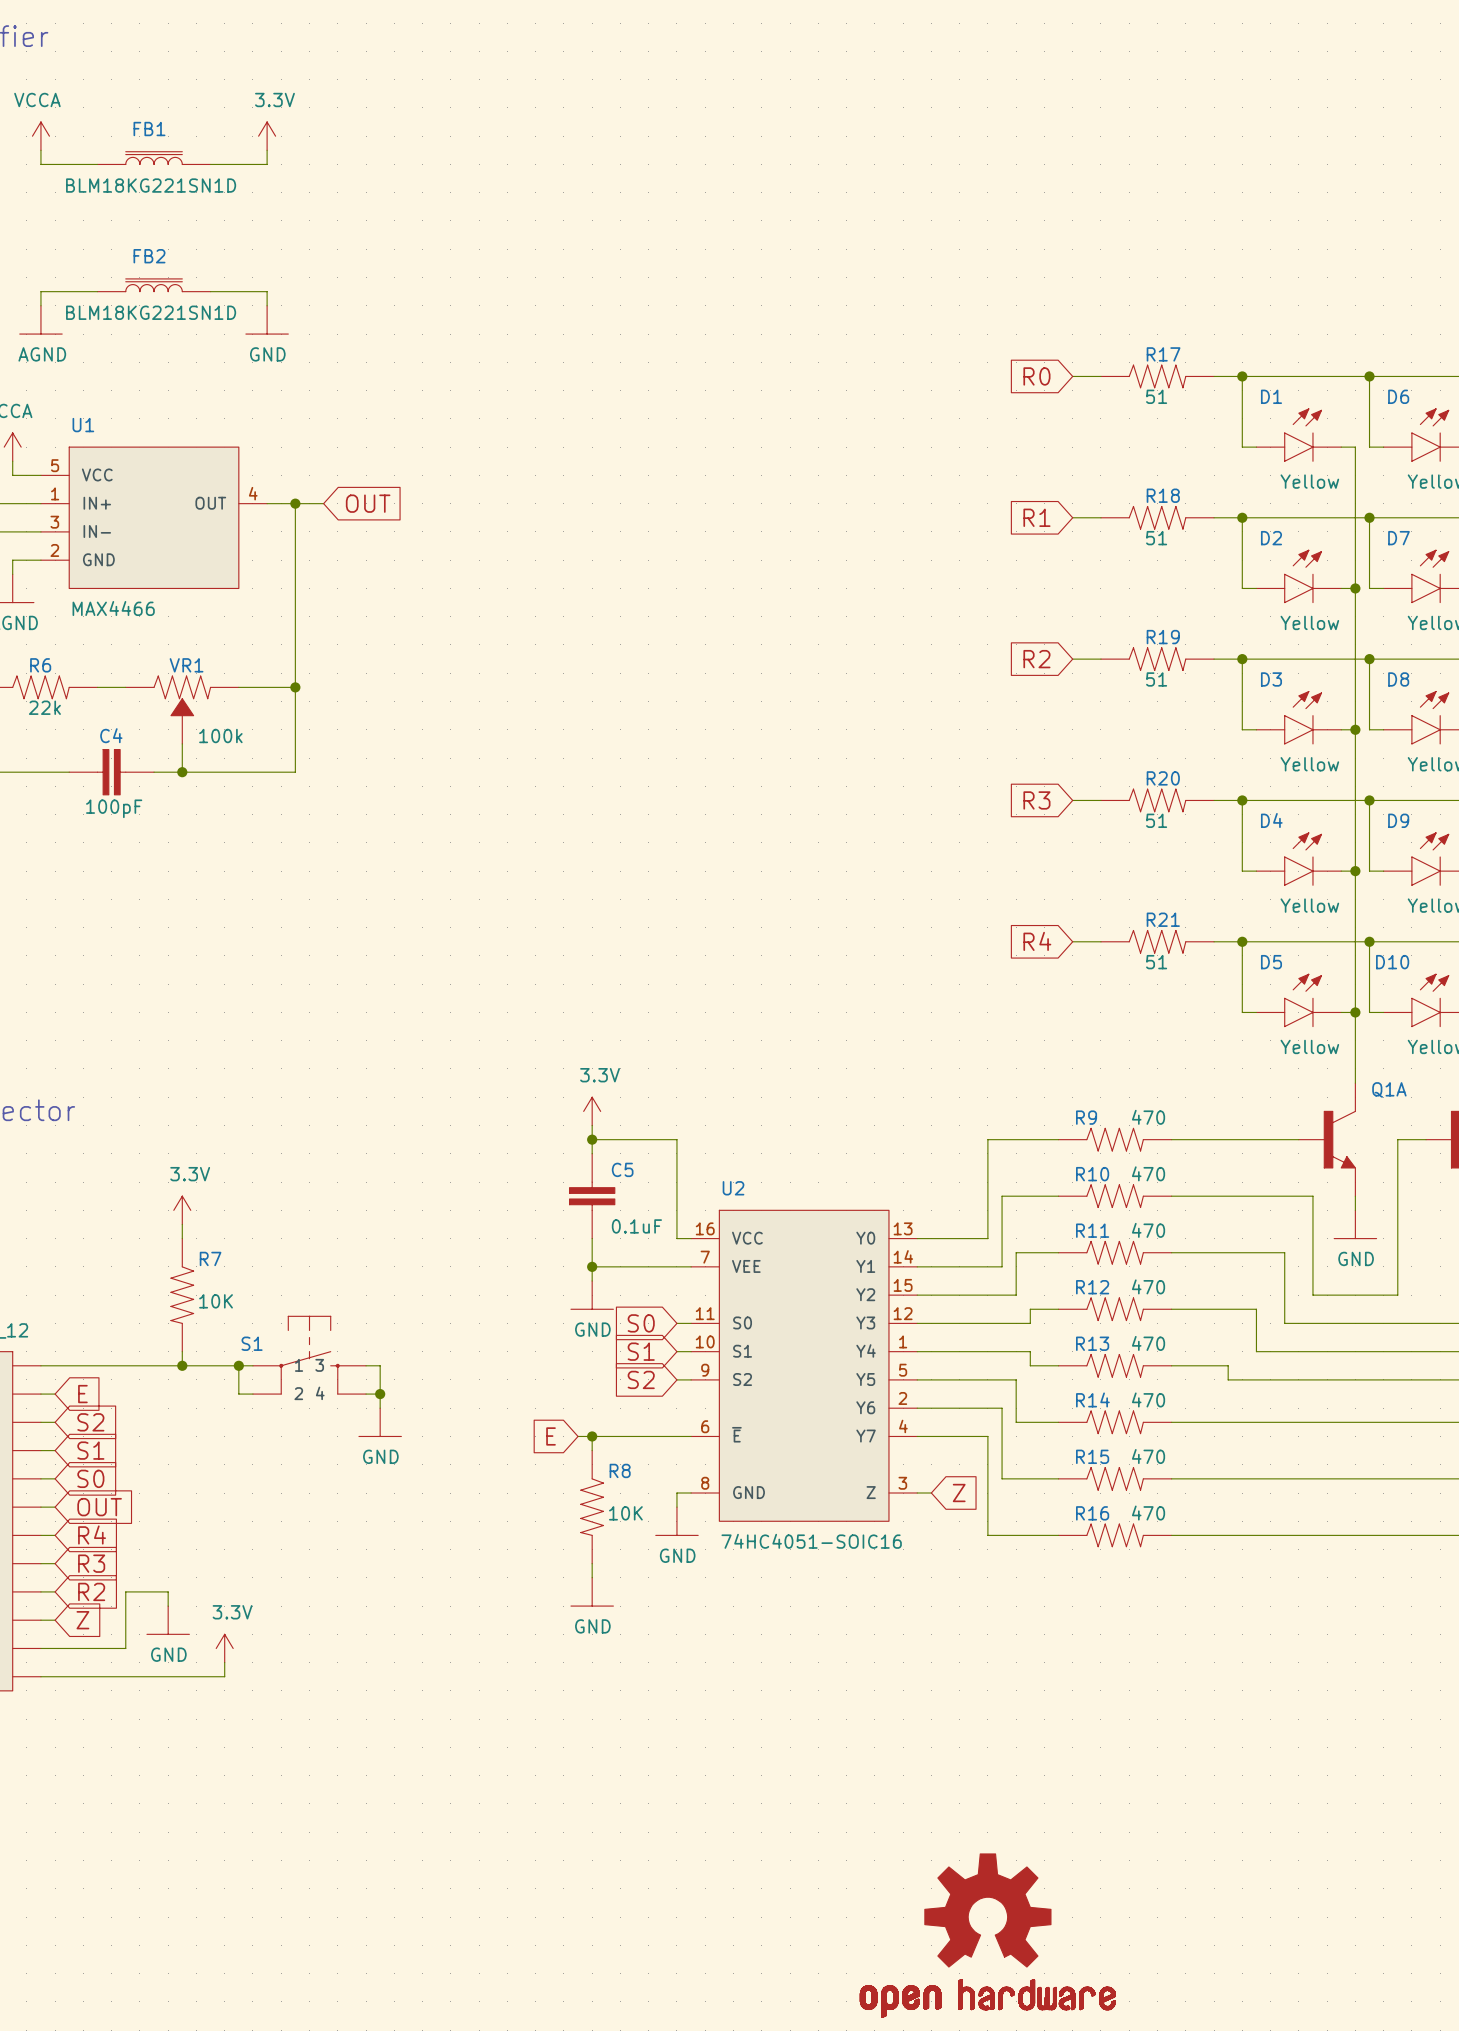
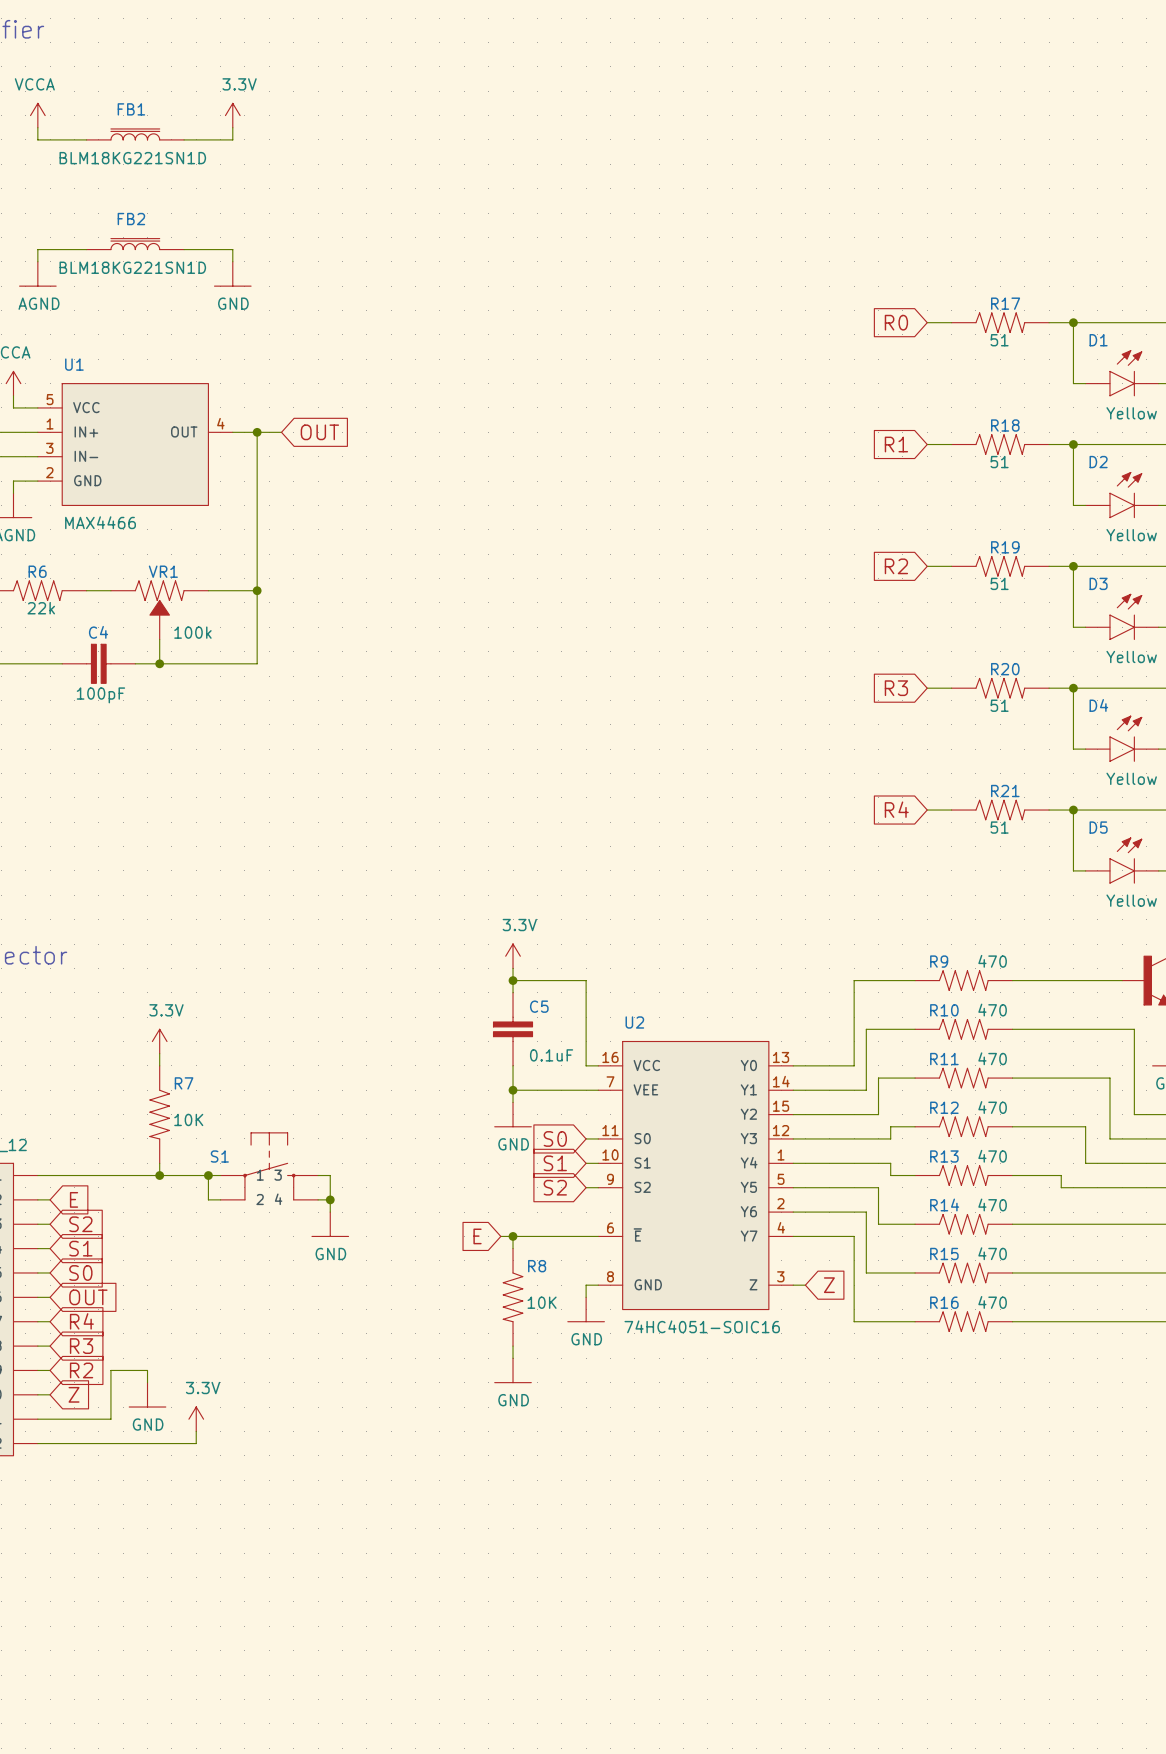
part: (987, 1935) -> none

